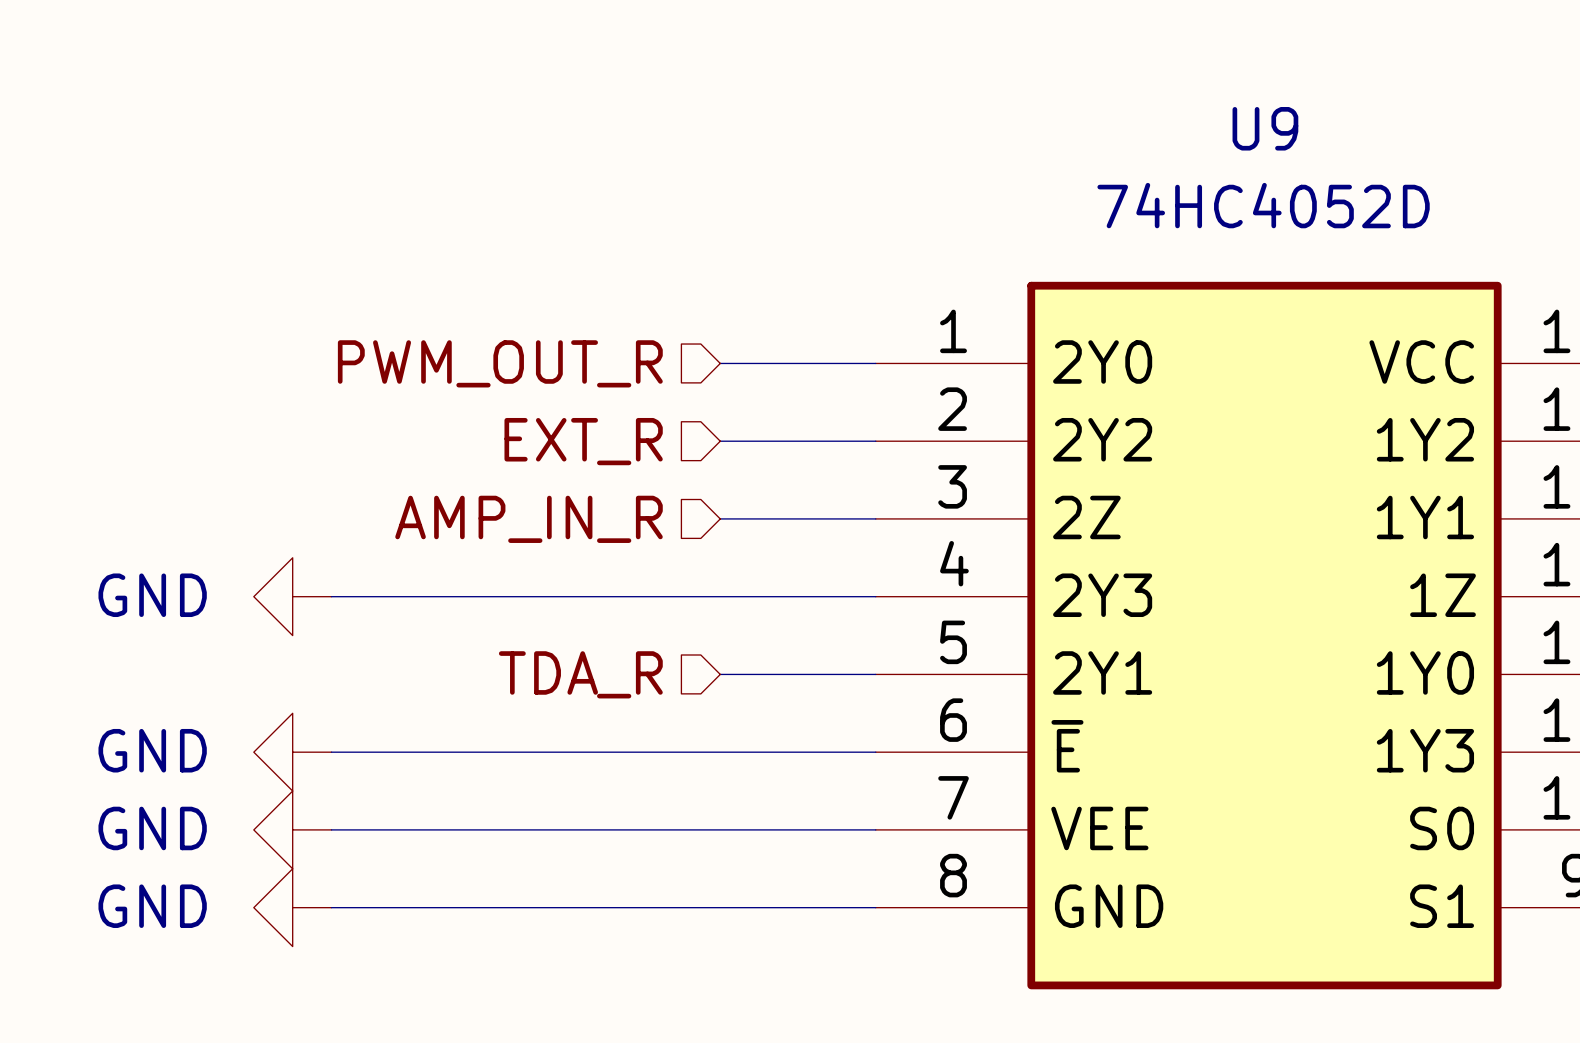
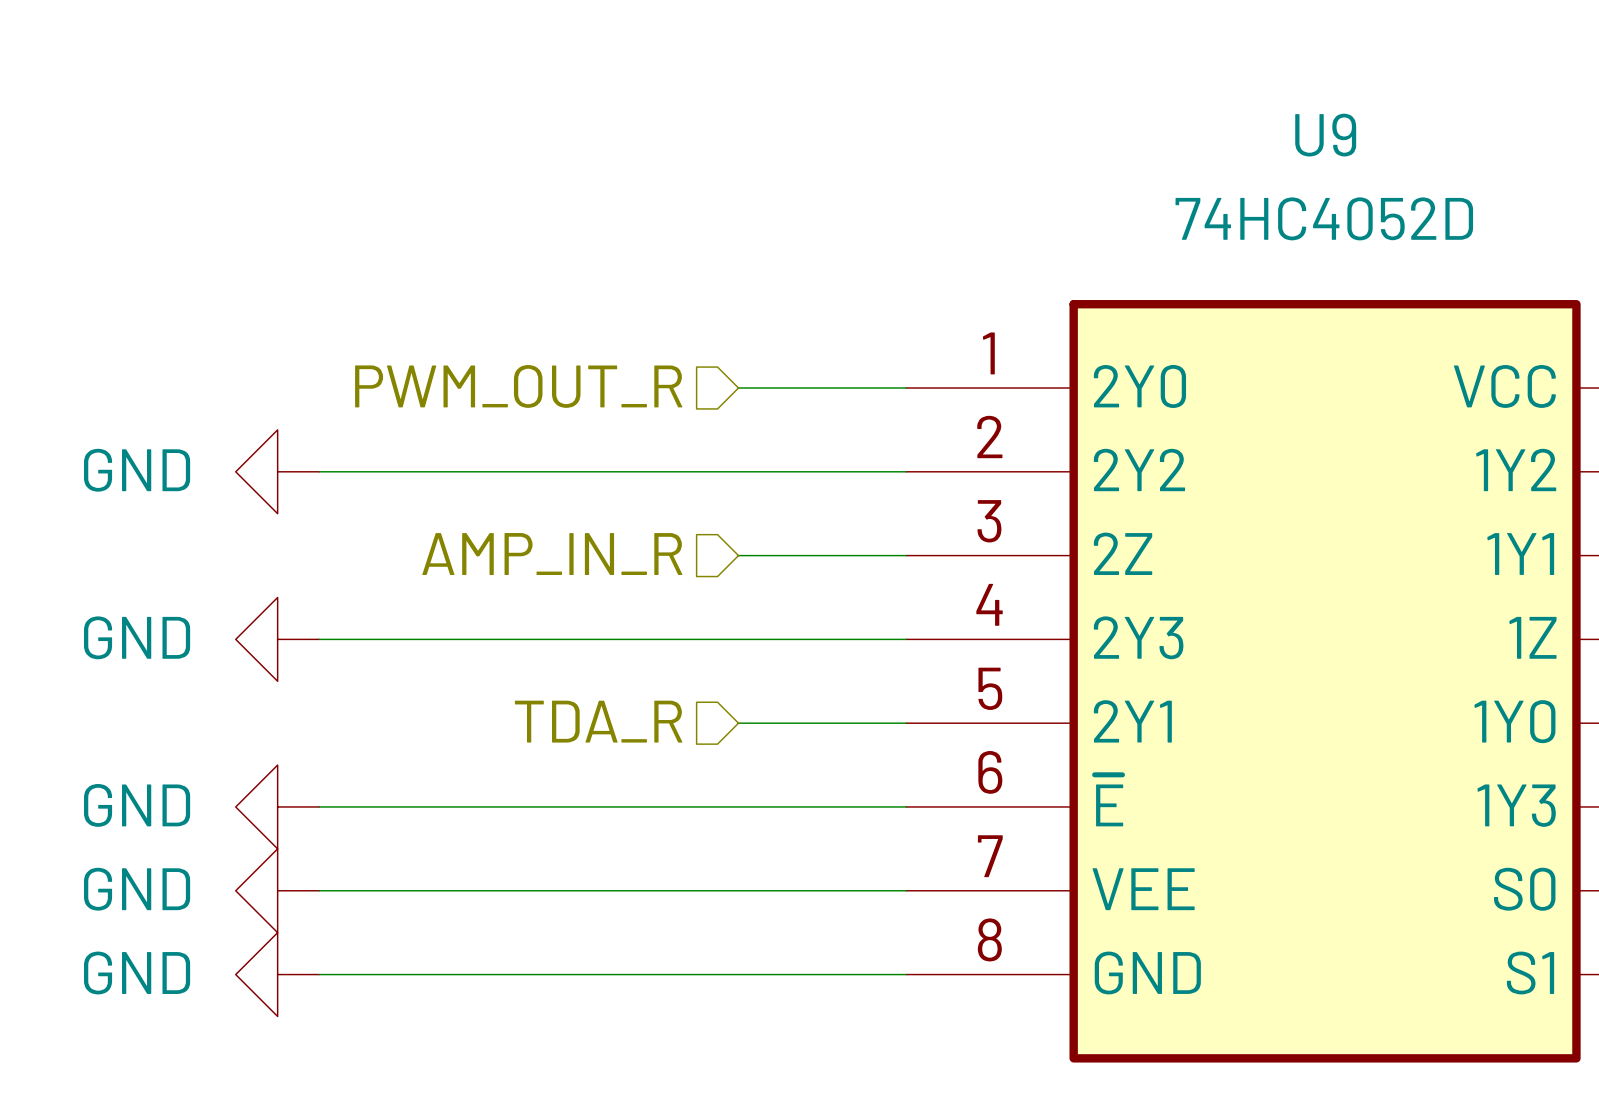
power symbol: none -> GND (277, 471)
wire: none -> (319, 471) (738, 471)
hierarchical label: EXT_R (583, 441) -> none

